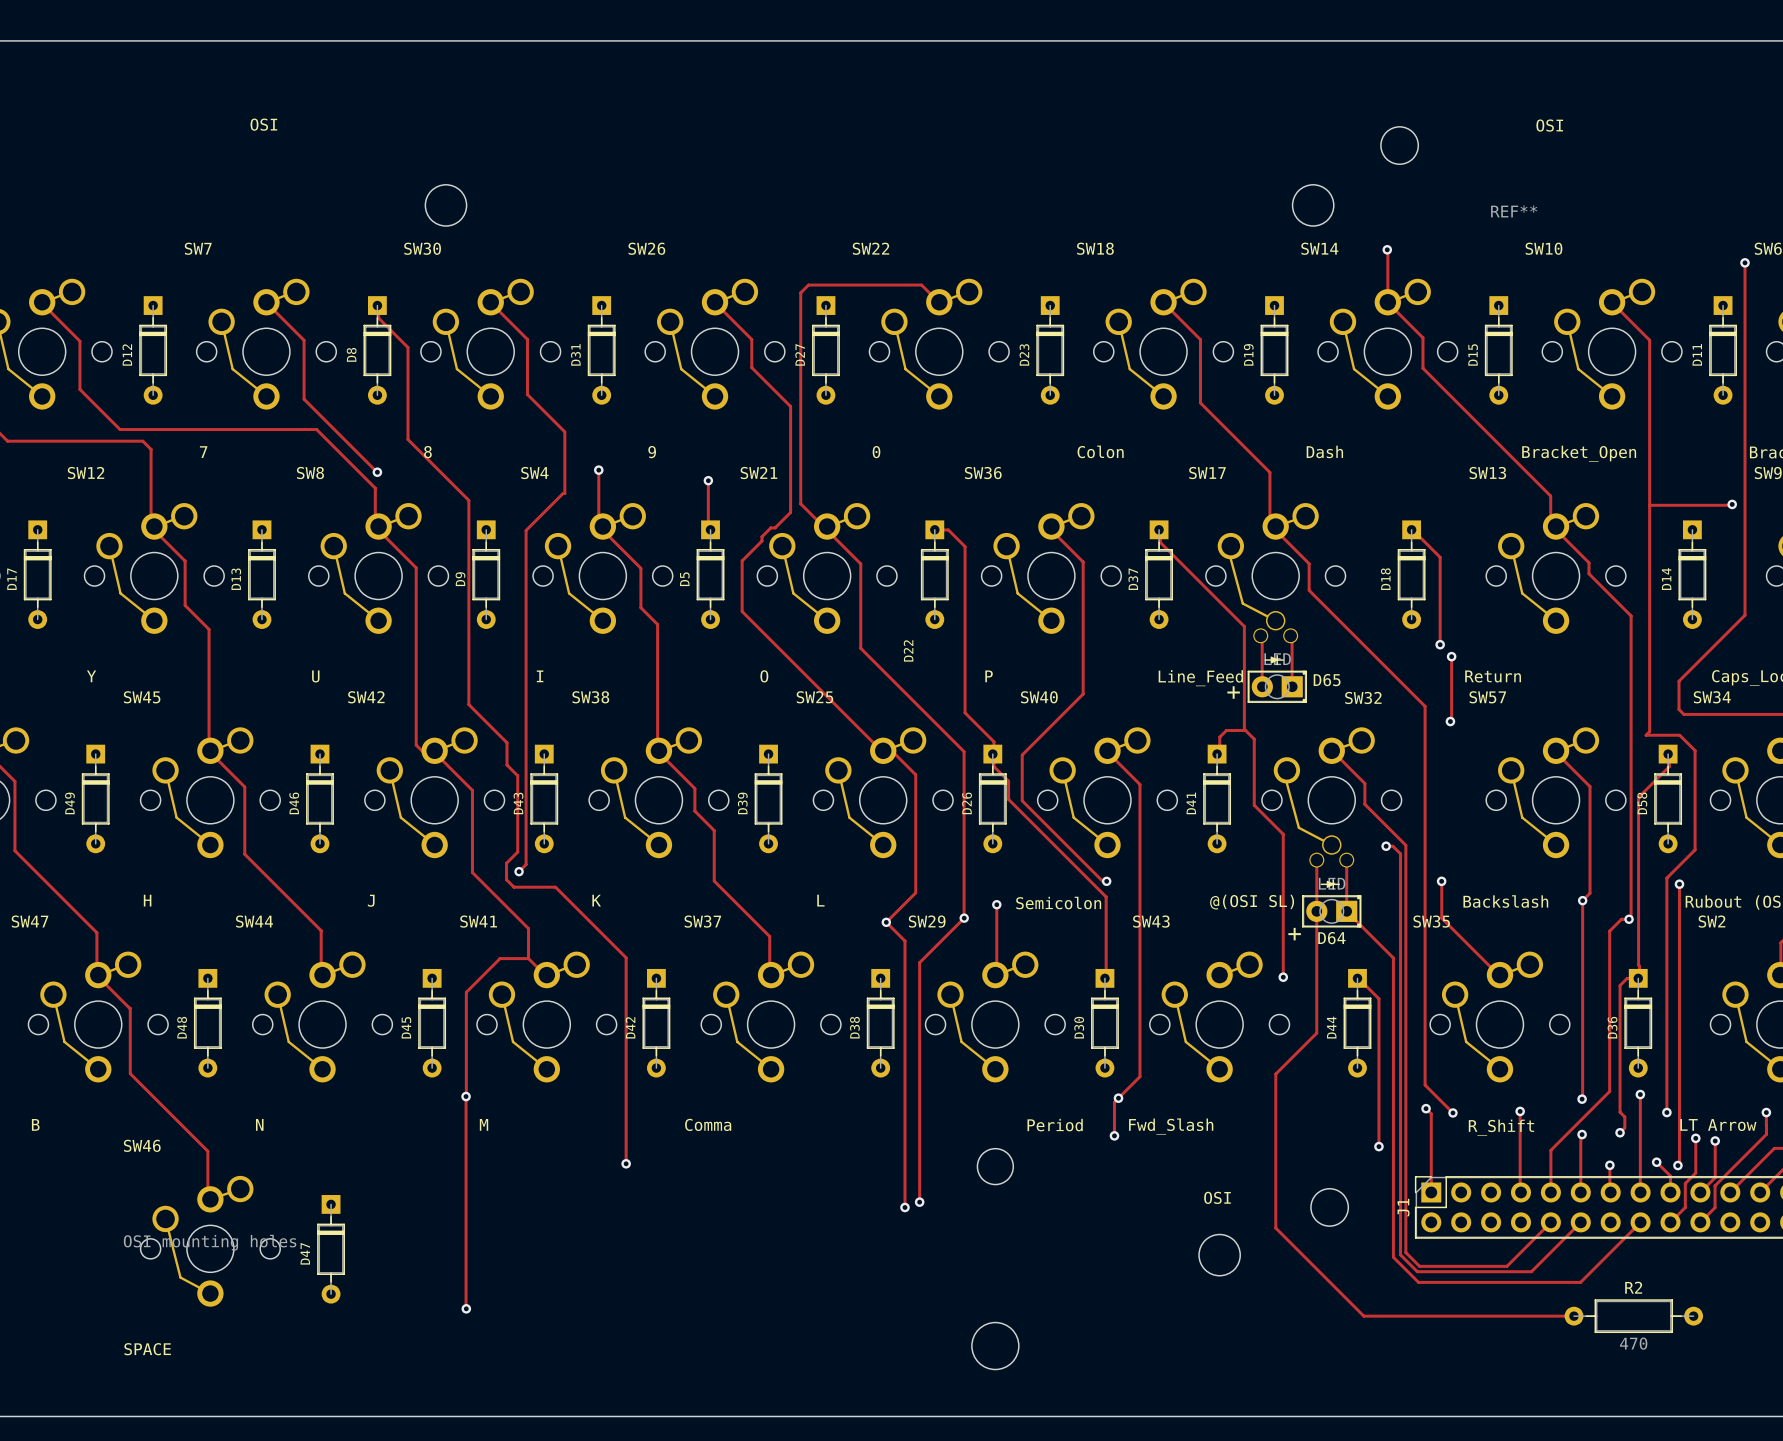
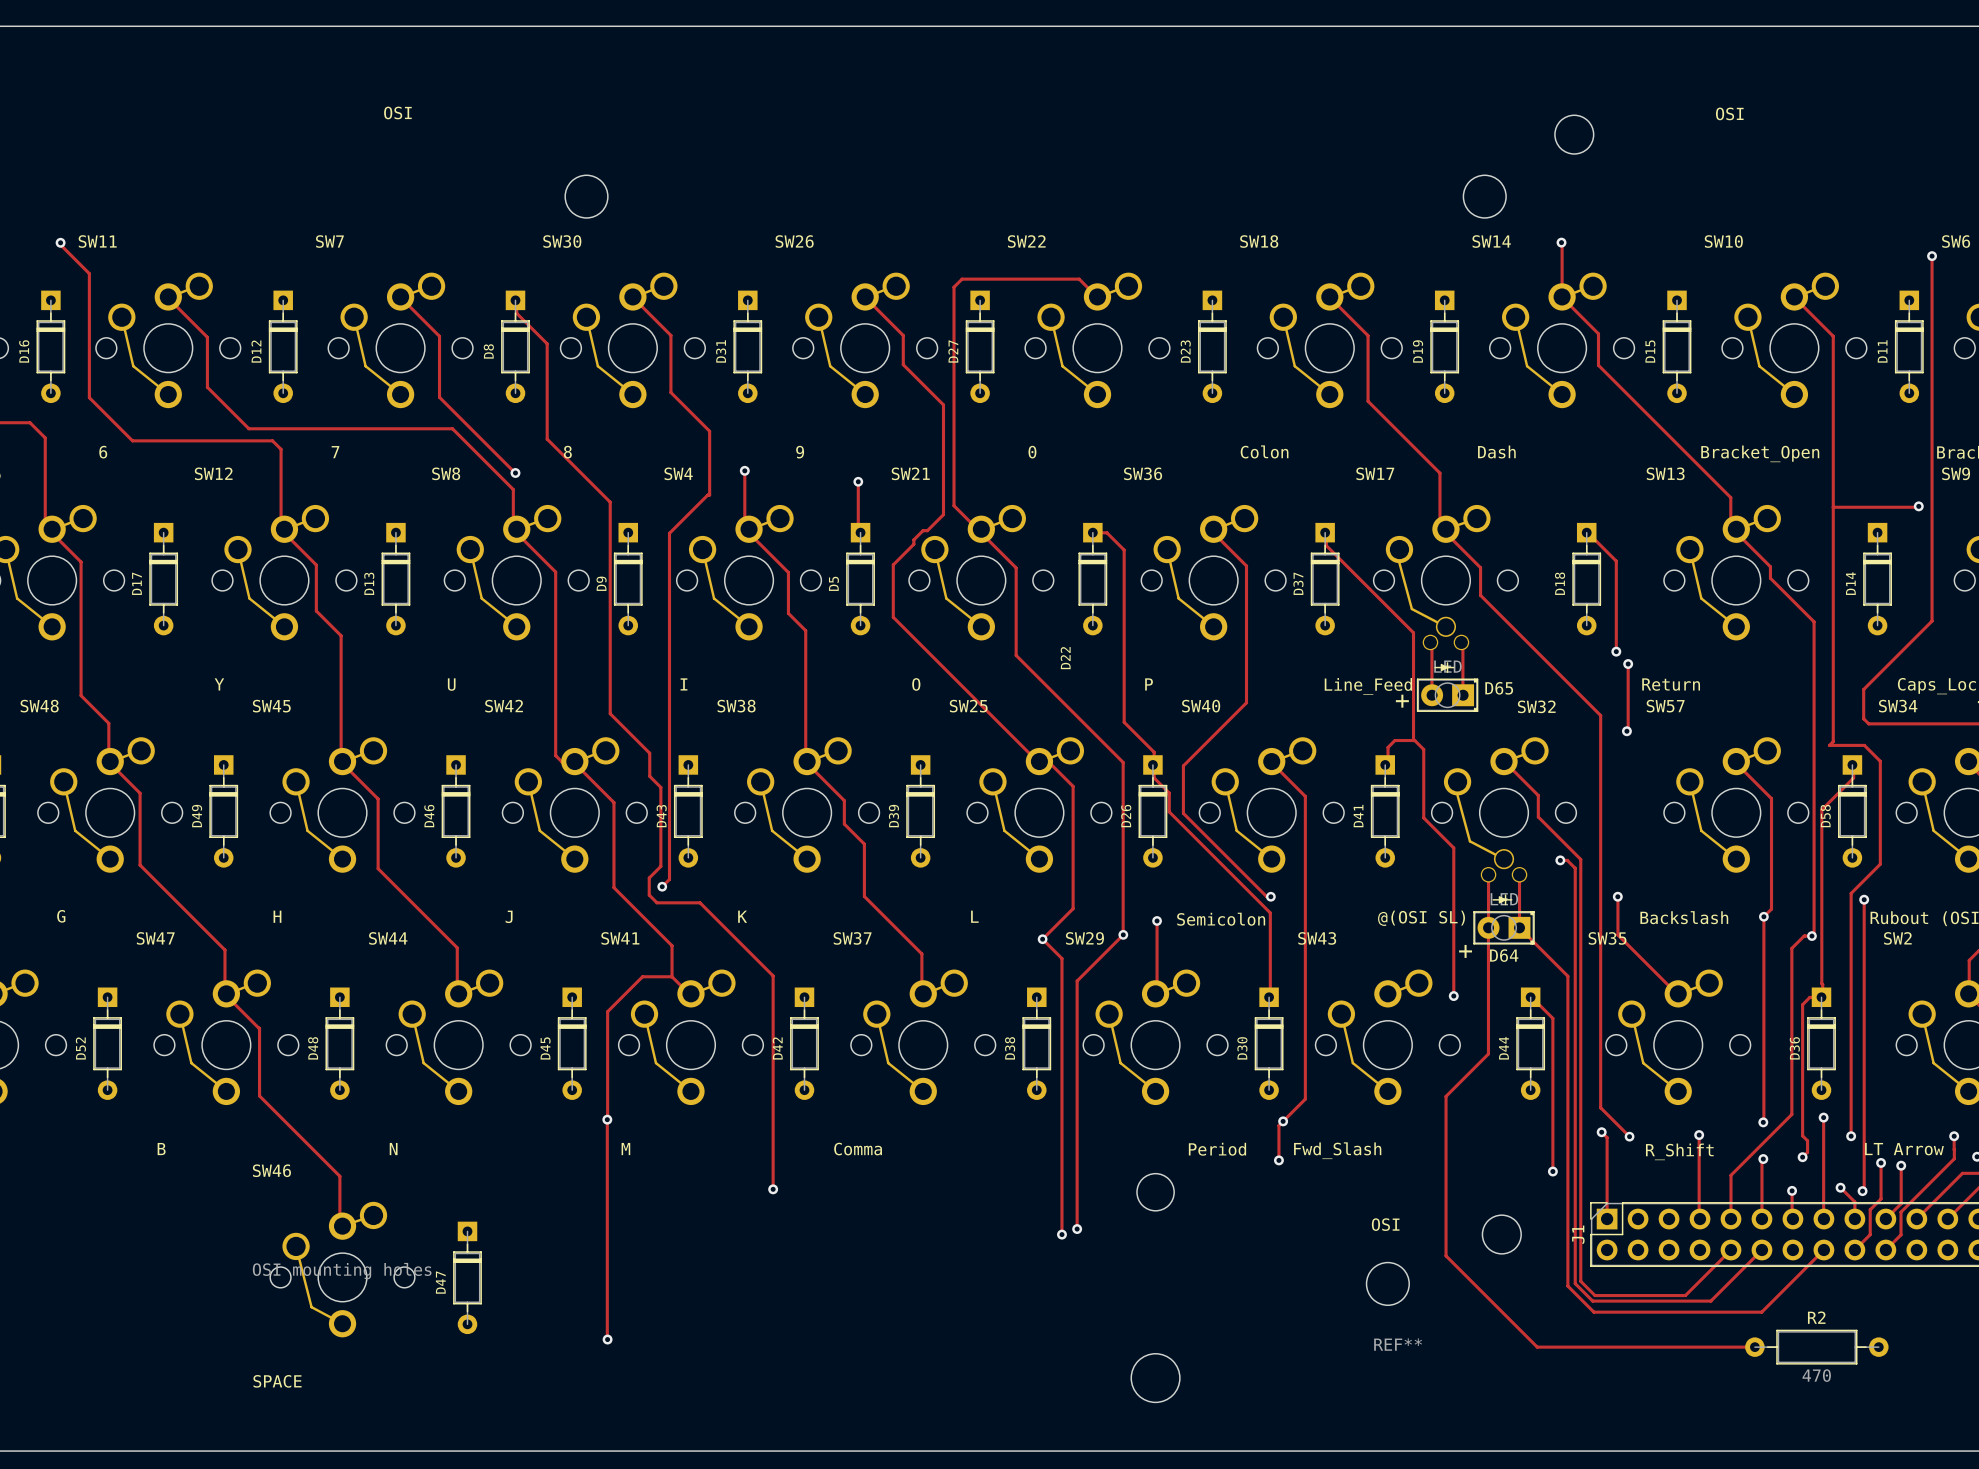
REF** name position: REF** (1514, 211) -> REF** (1398, 1344)

